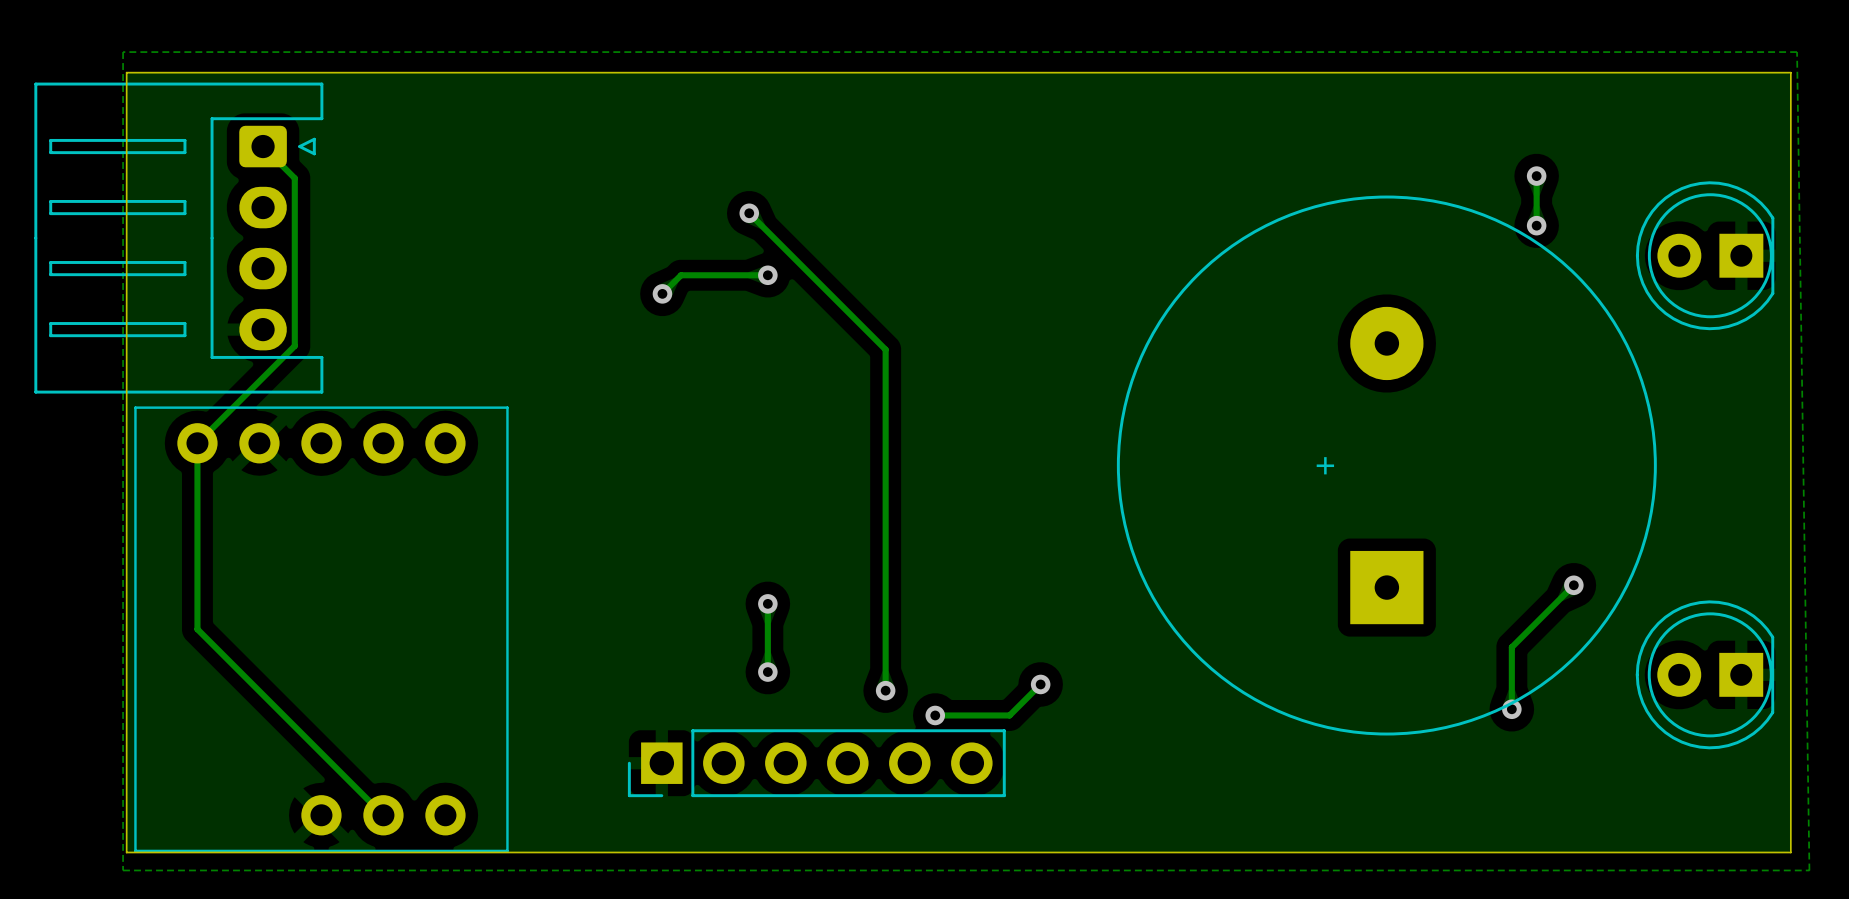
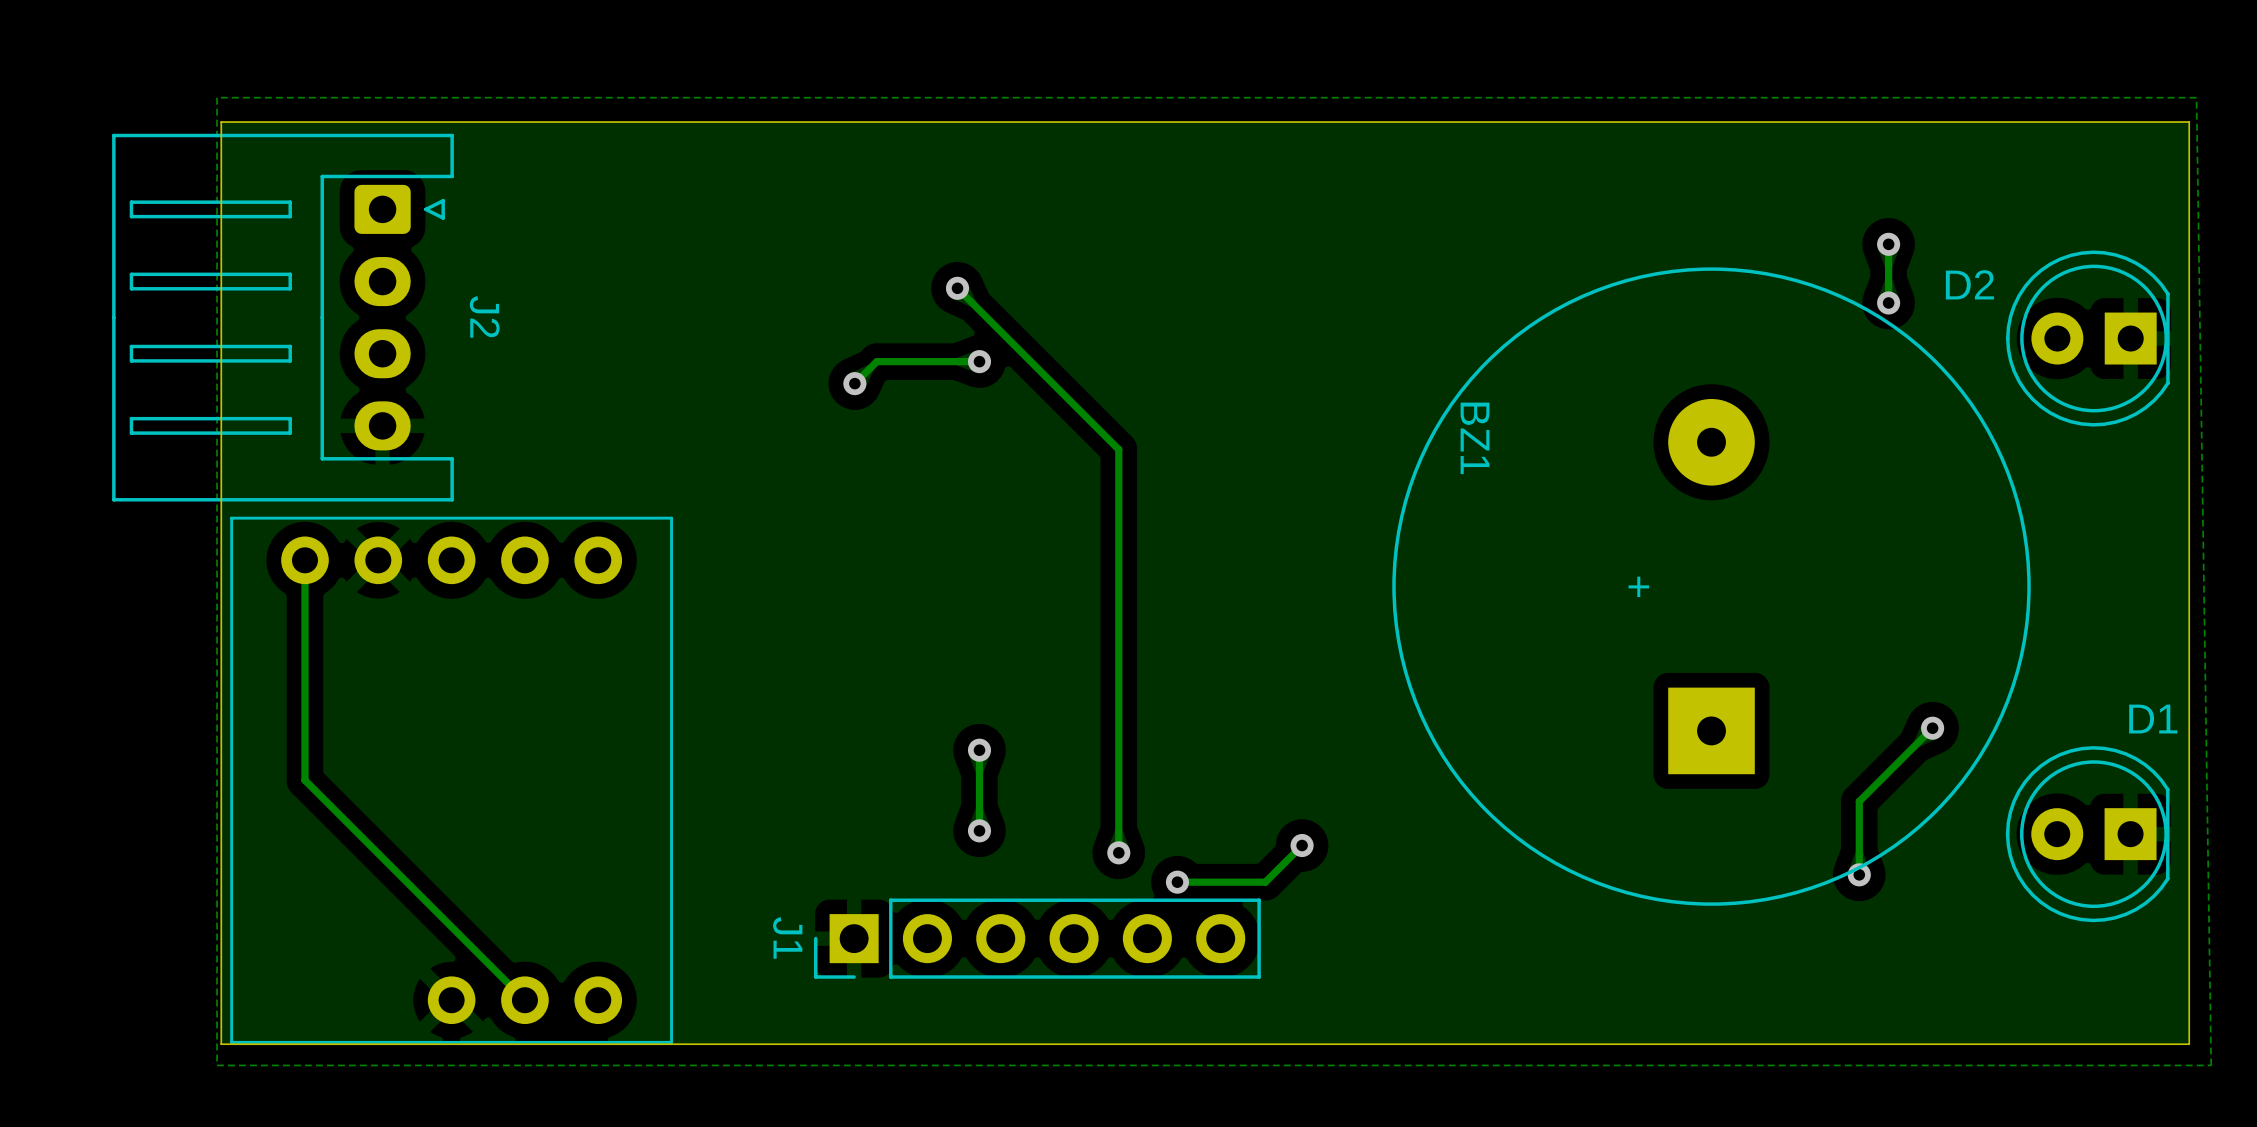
track: (263, 146) (294, 178) (294, 345) (197, 443) -> none
D2 name: none -> D2 (1969, 284)
J2 name: none -> J2 (484, 316)
BZ1 name: none -> BZ1 (1475, 438)
D1 name: none -> D1 (2153, 719)
J1 name: none -> J1 (787, 937)

